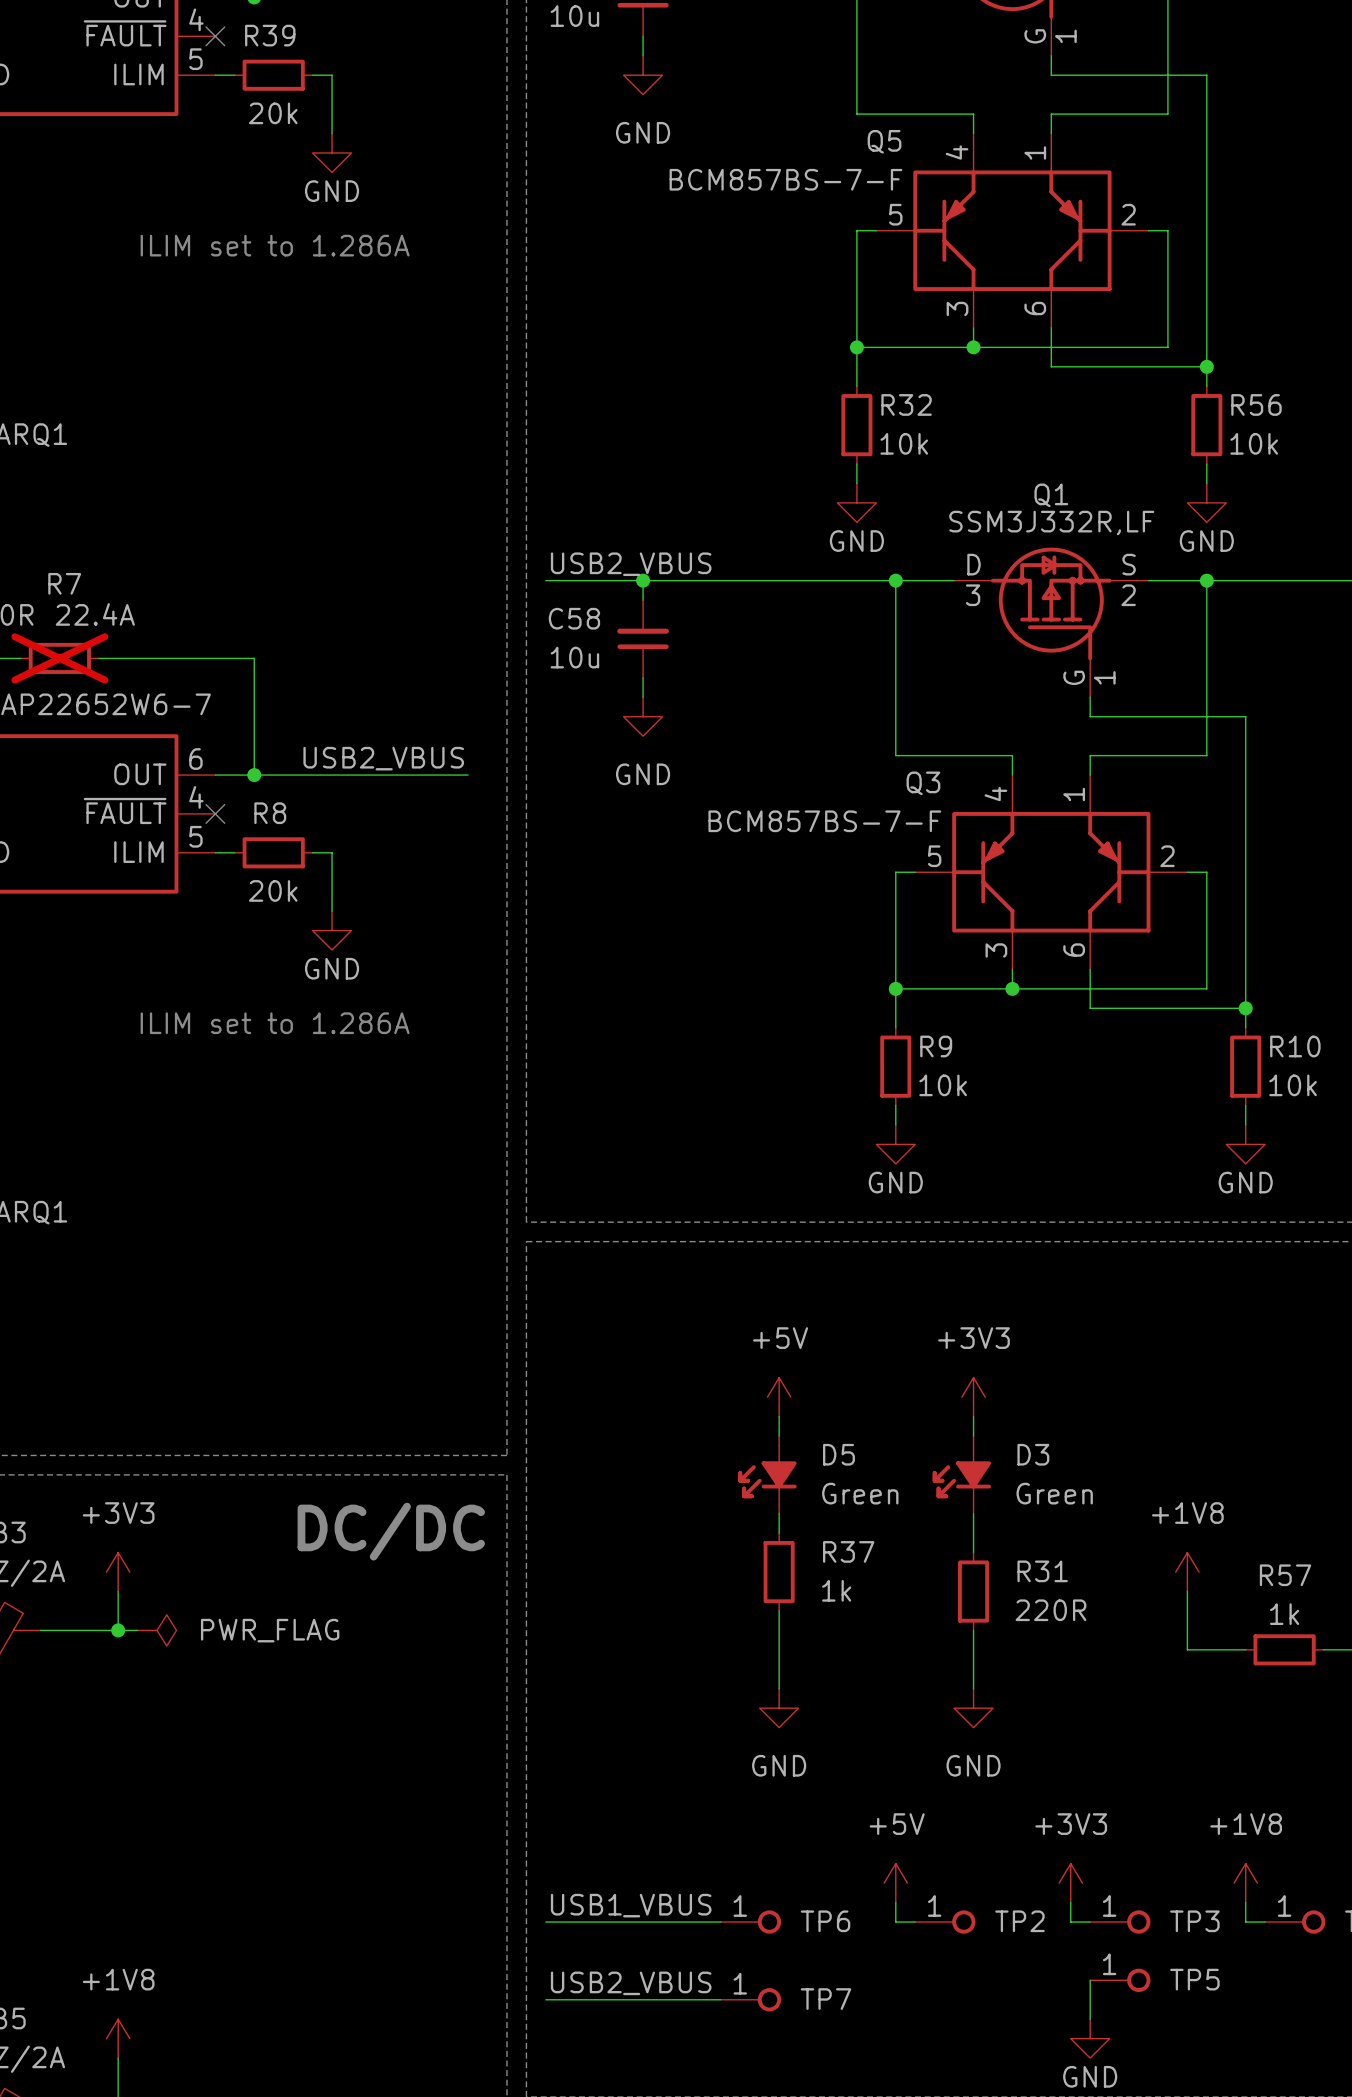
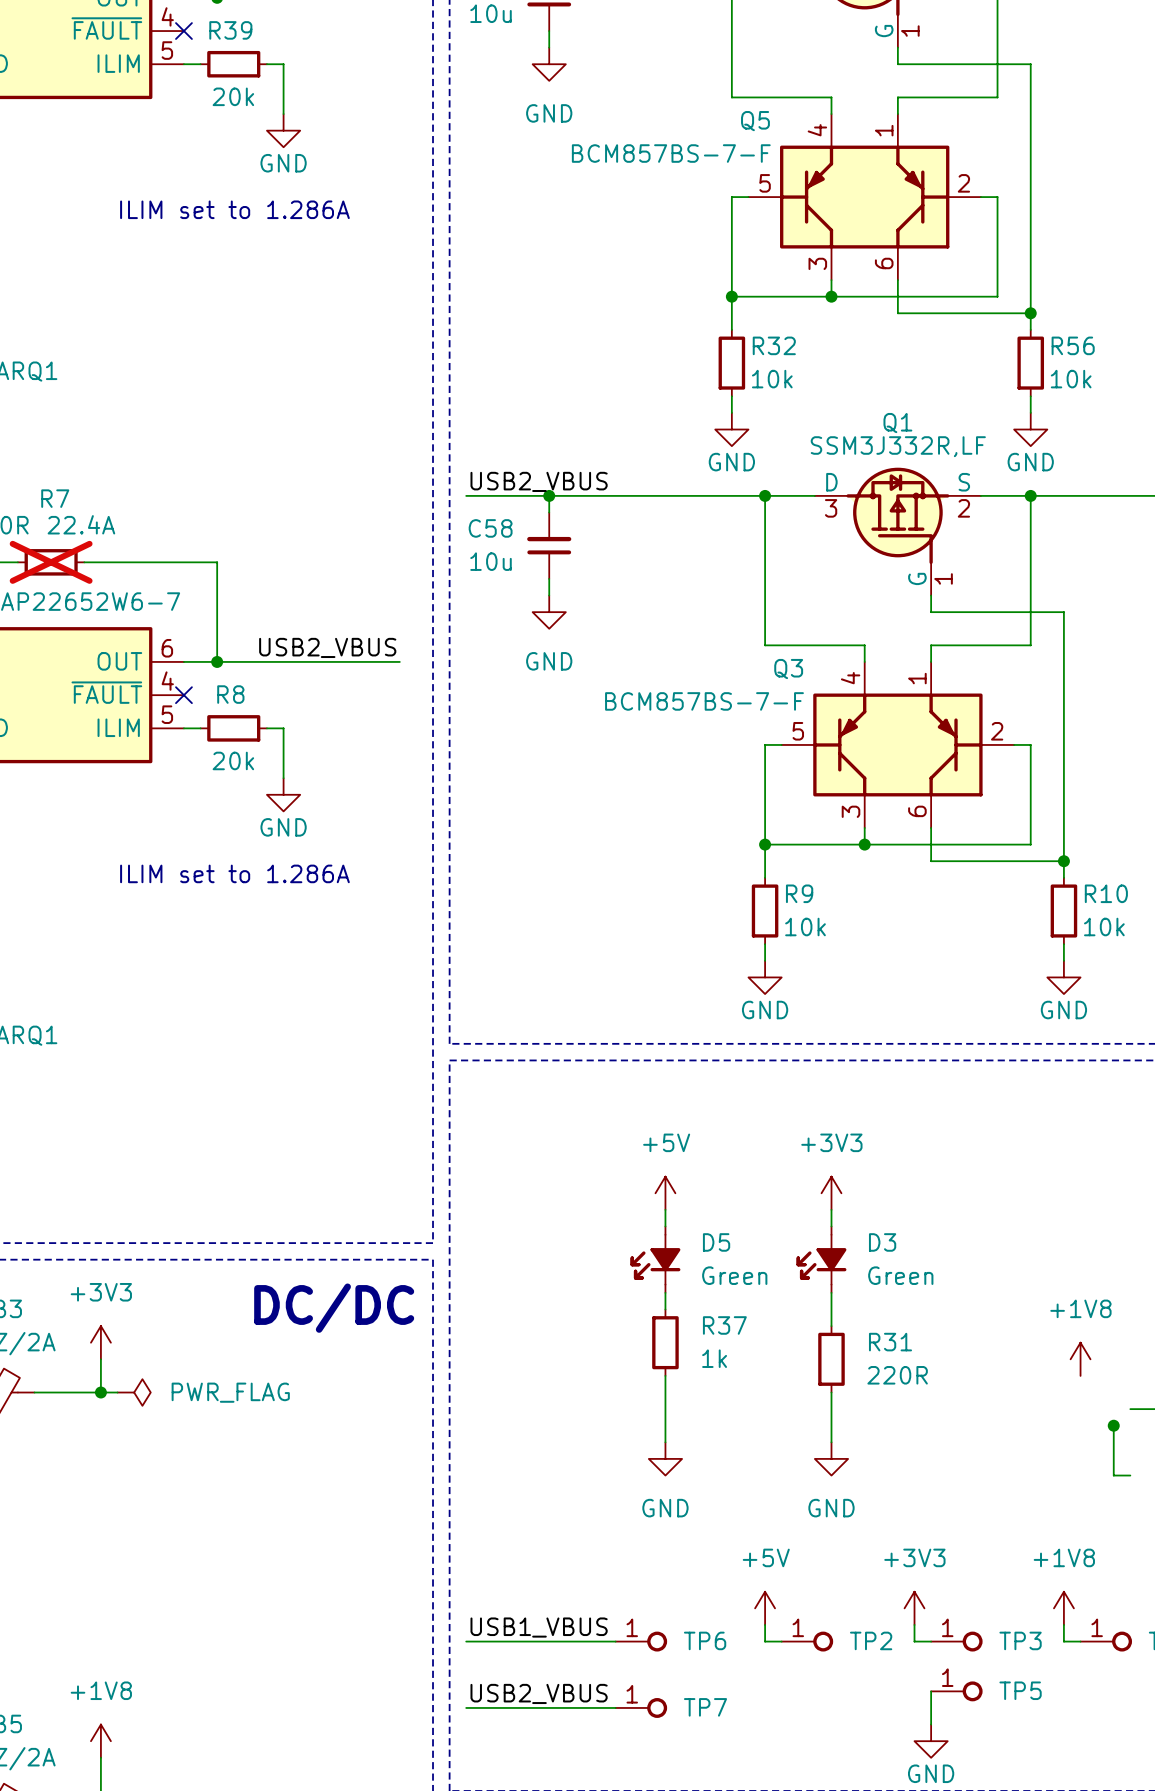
power symbol position: +1V8 (1187, 1572) -> +1V8 (1080, 1359)
wire: (1187, 1591) (1187, 1649) (1245, 1649) -> none
R57: (1284, 1649) -> none
wire: none -> (1113, 1425) (1113, 1475) (1130, 1475)
junction: none -> (1113, 1425)

